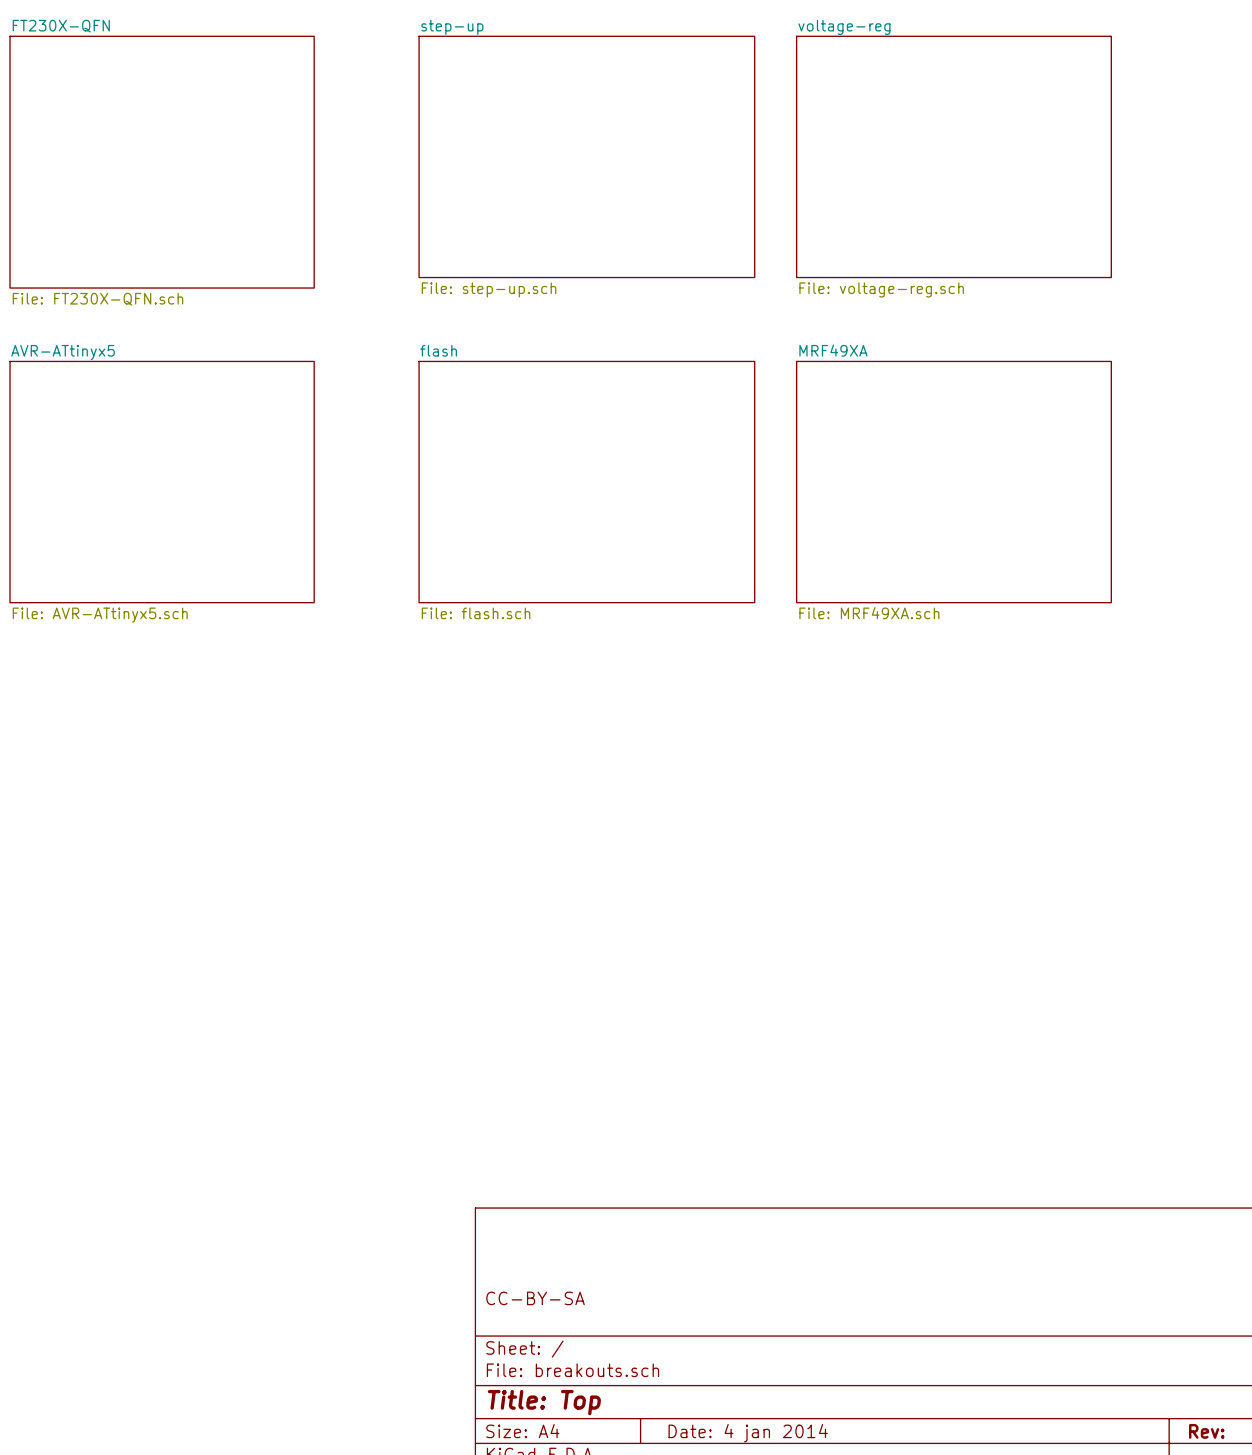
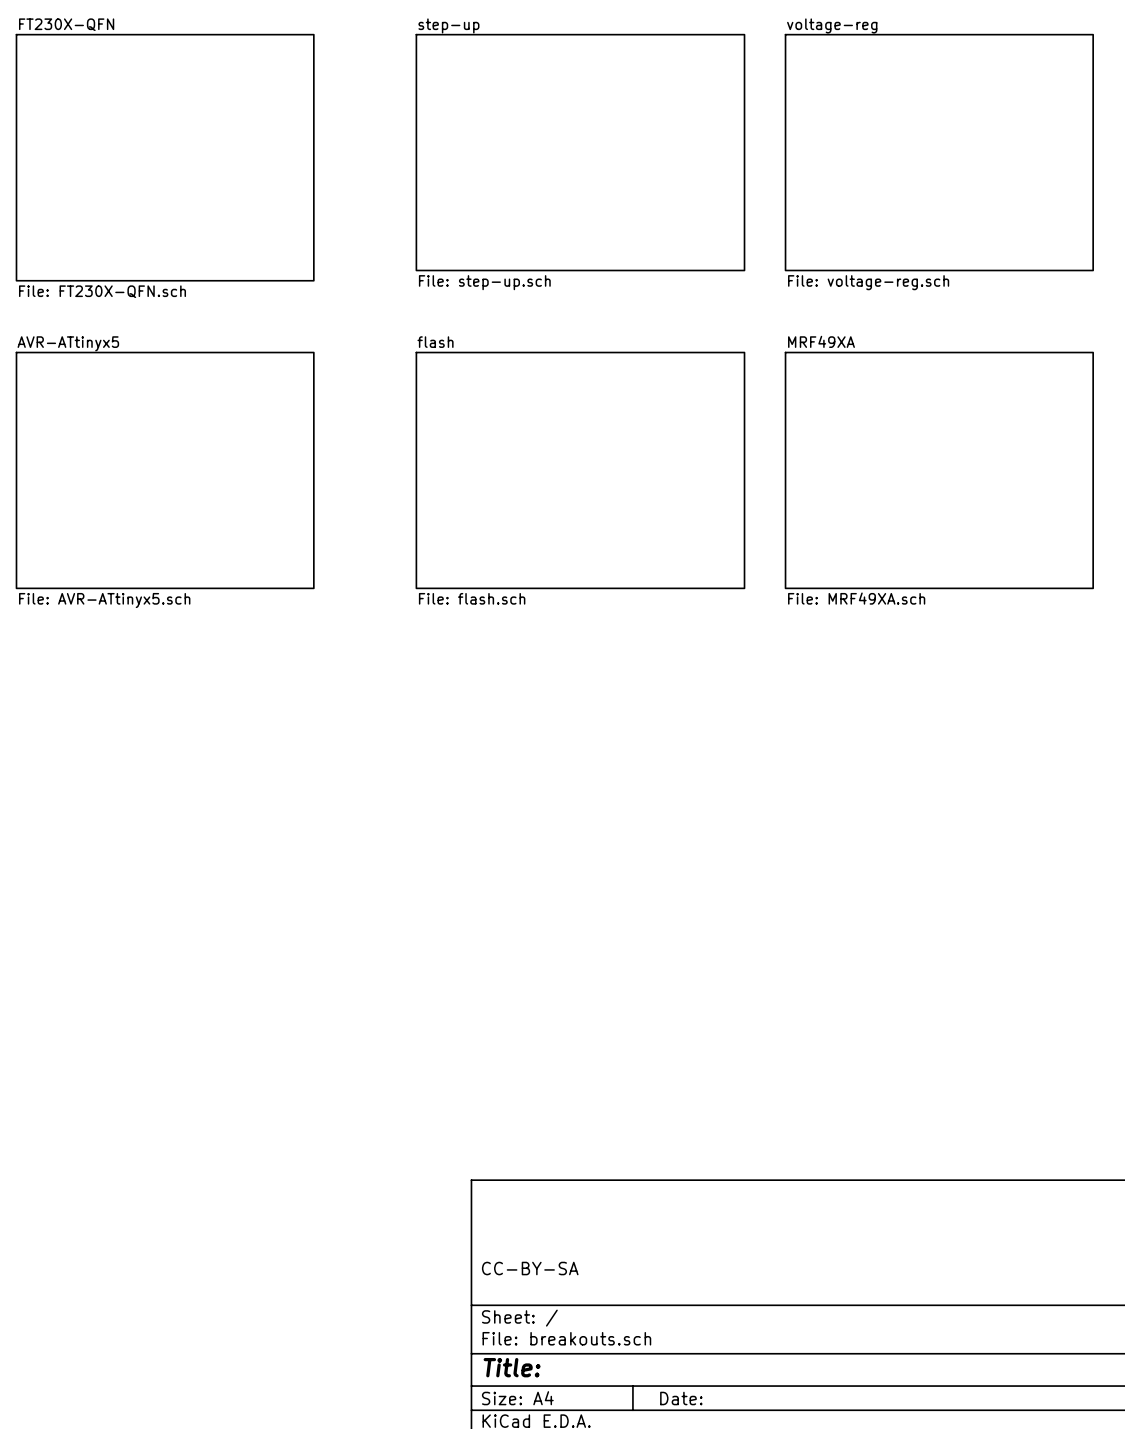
title block: Title: Top (544, 1402) -> Title: (512, 1367)
title block: Date: 4 jan 2014 (748, 1433) -> Date: (681, 1398)

